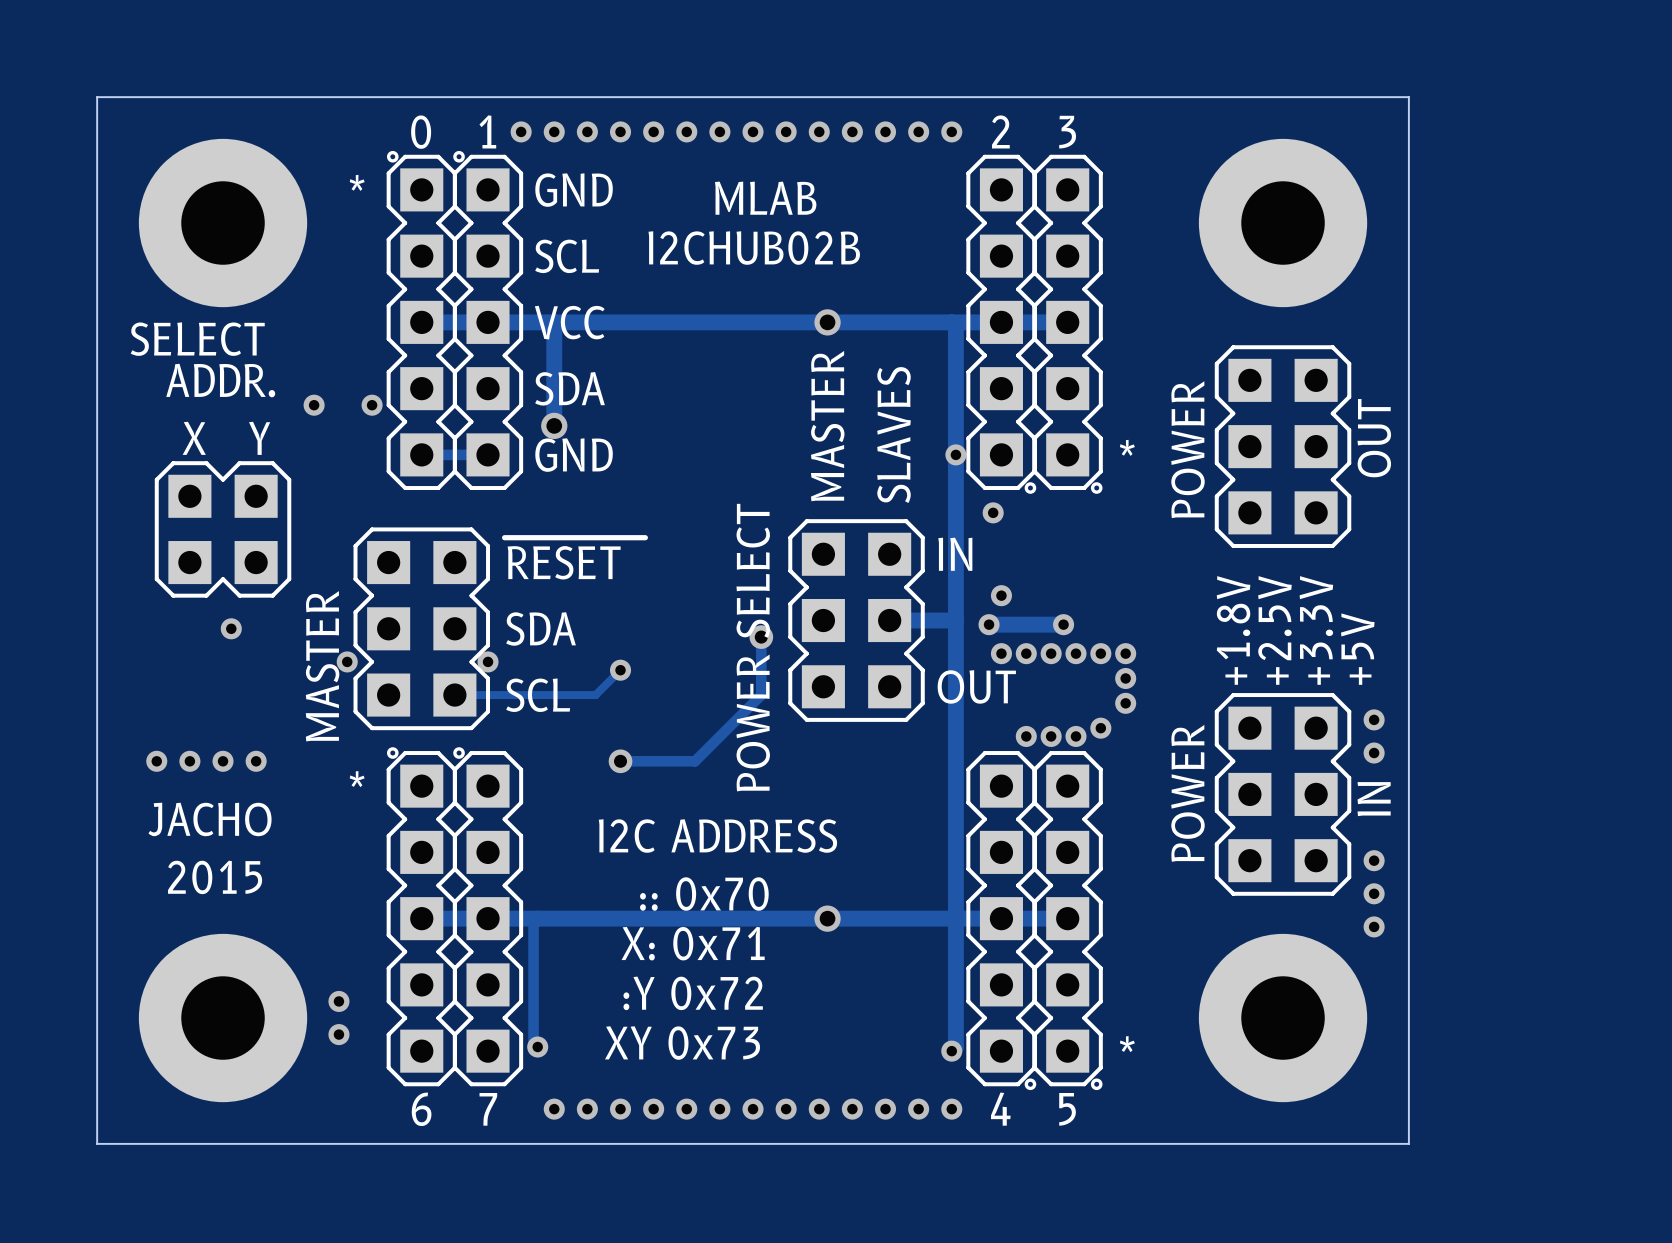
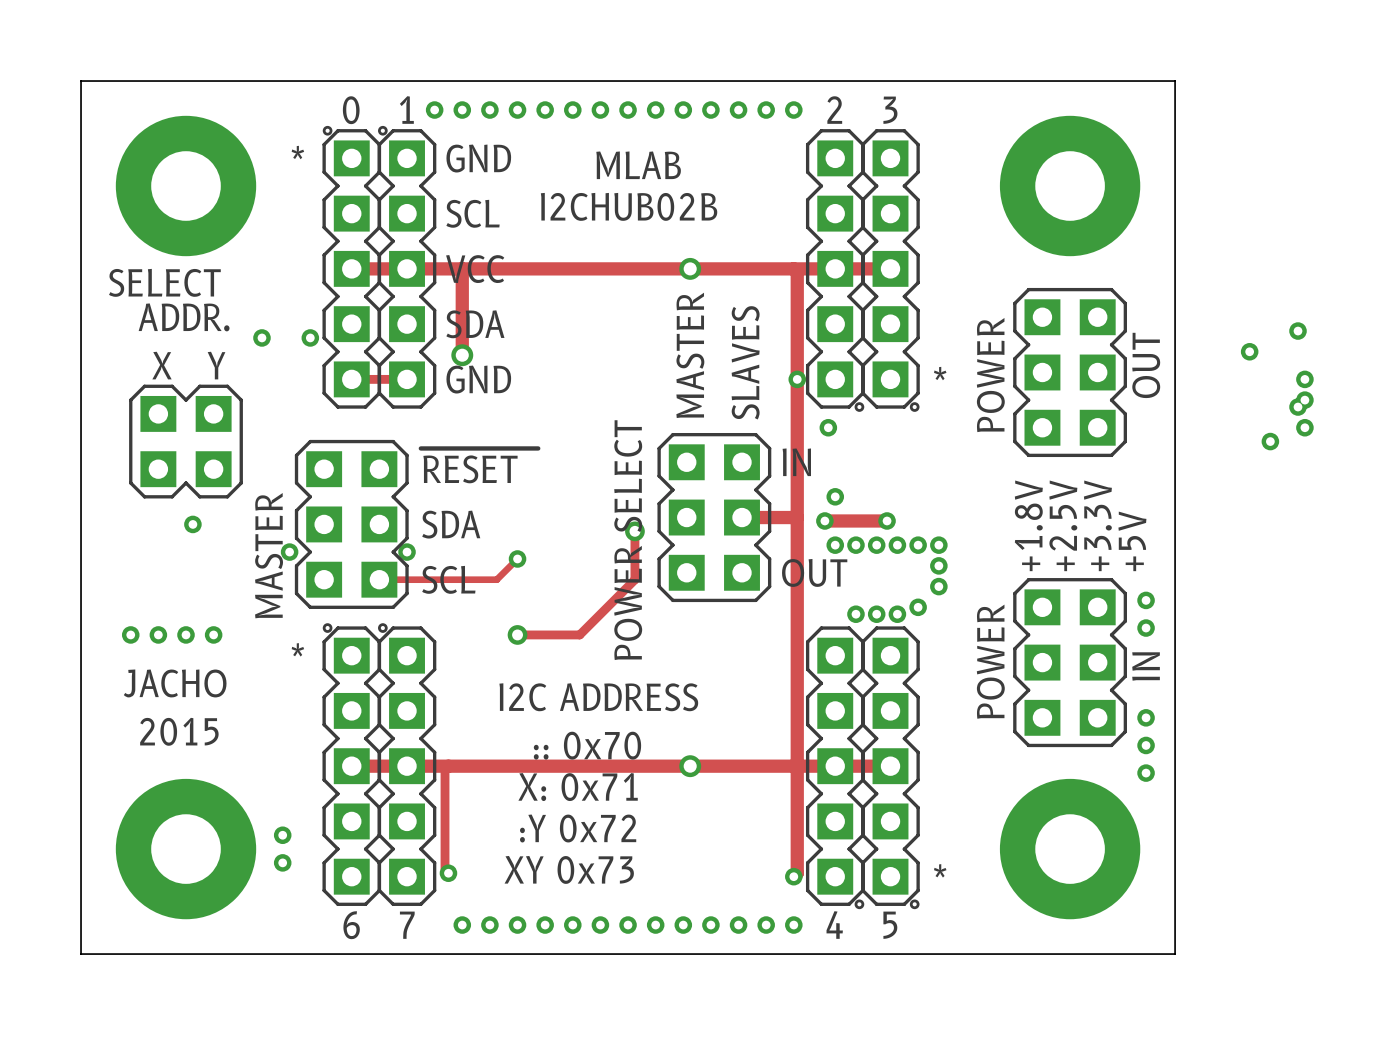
via: none -> (1298, 331)
via: none -> (1249, 351)
via: none -> (1304, 379)
via: none -> (1304, 400)
via: none -> (1298, 407)
via: none -> (1304, 427)
via: none -> (1270, 441)

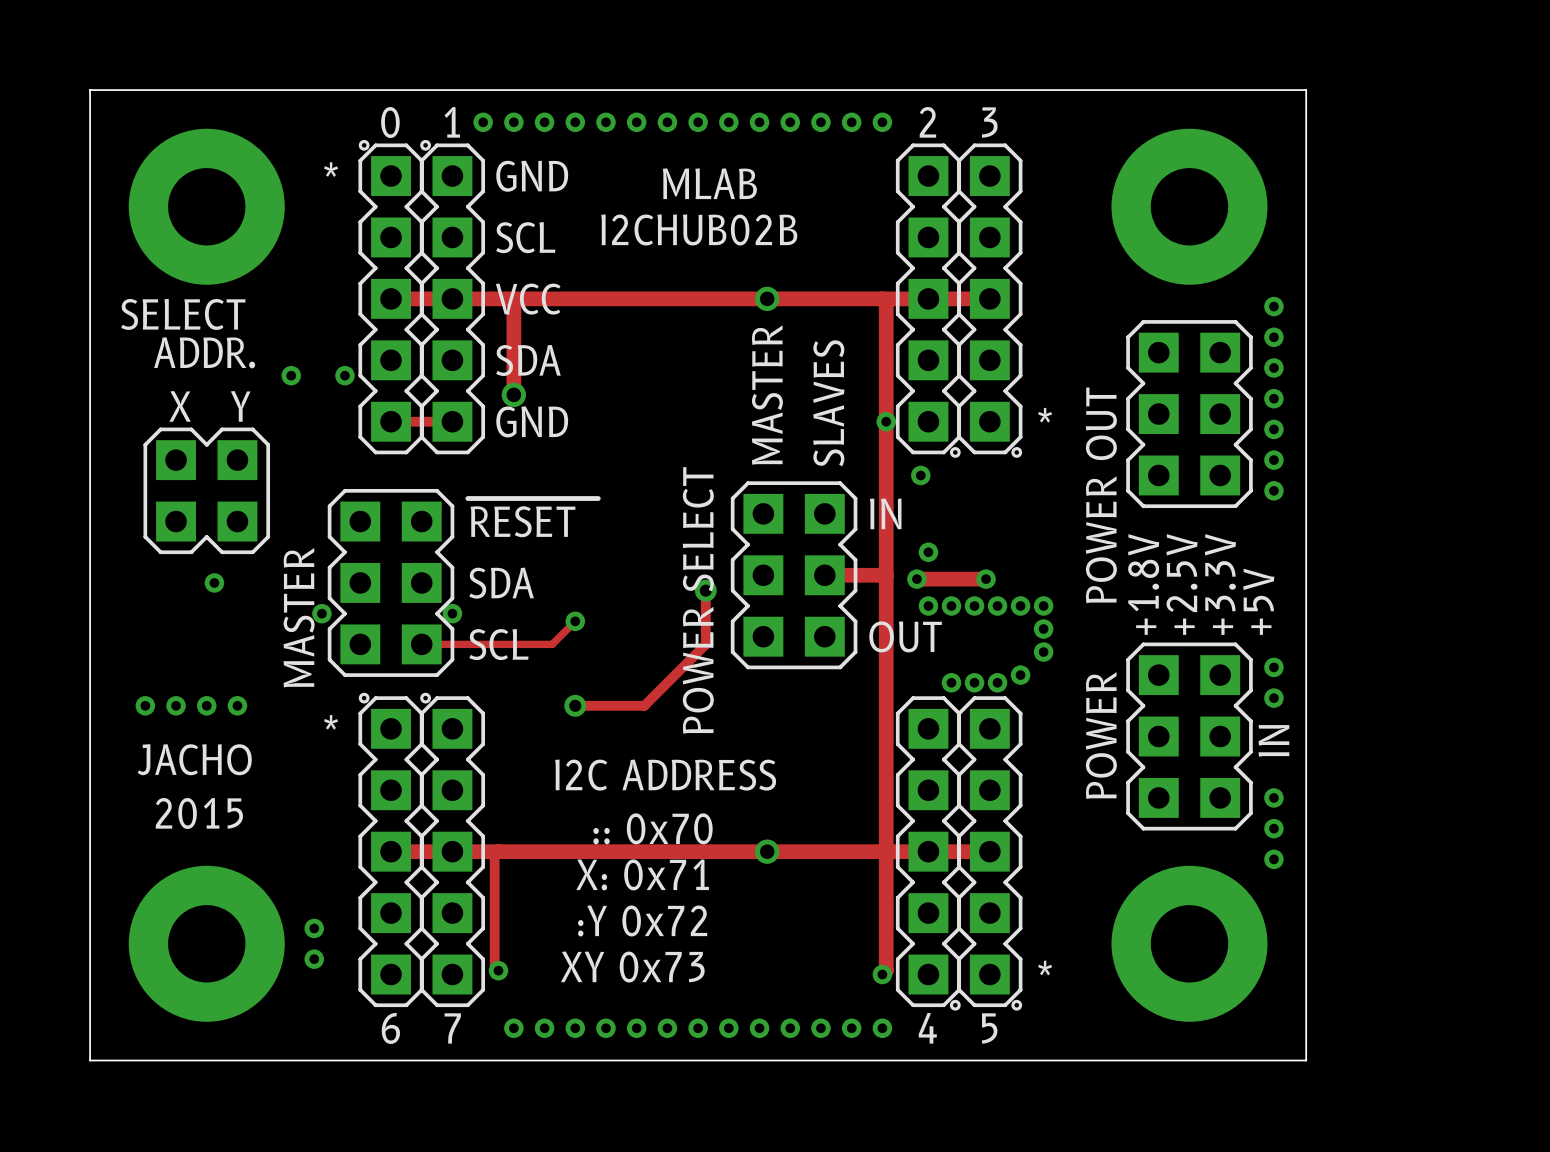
via: none -> (1273, 306)
via: none -> (1273, 337)
via: none -> (1273, 367)
via: (1298, 331) -> none
via: (1249, 351) -> none
via: none -> (1273, 398)
text: OUT (1146, 365) -> none
text: POWER (990, 375) -> POWER OUT (1101, 495)
via: (1304, 379) -> none
via: none -> (1273, 429)
via: (1304, 400) -> none
via: (1298, 407) -> none
via: none -> (1273, 460)
via: (1304, 427) -> none
via: none -> (1273, 490)
via: (1270, 441) -> none

